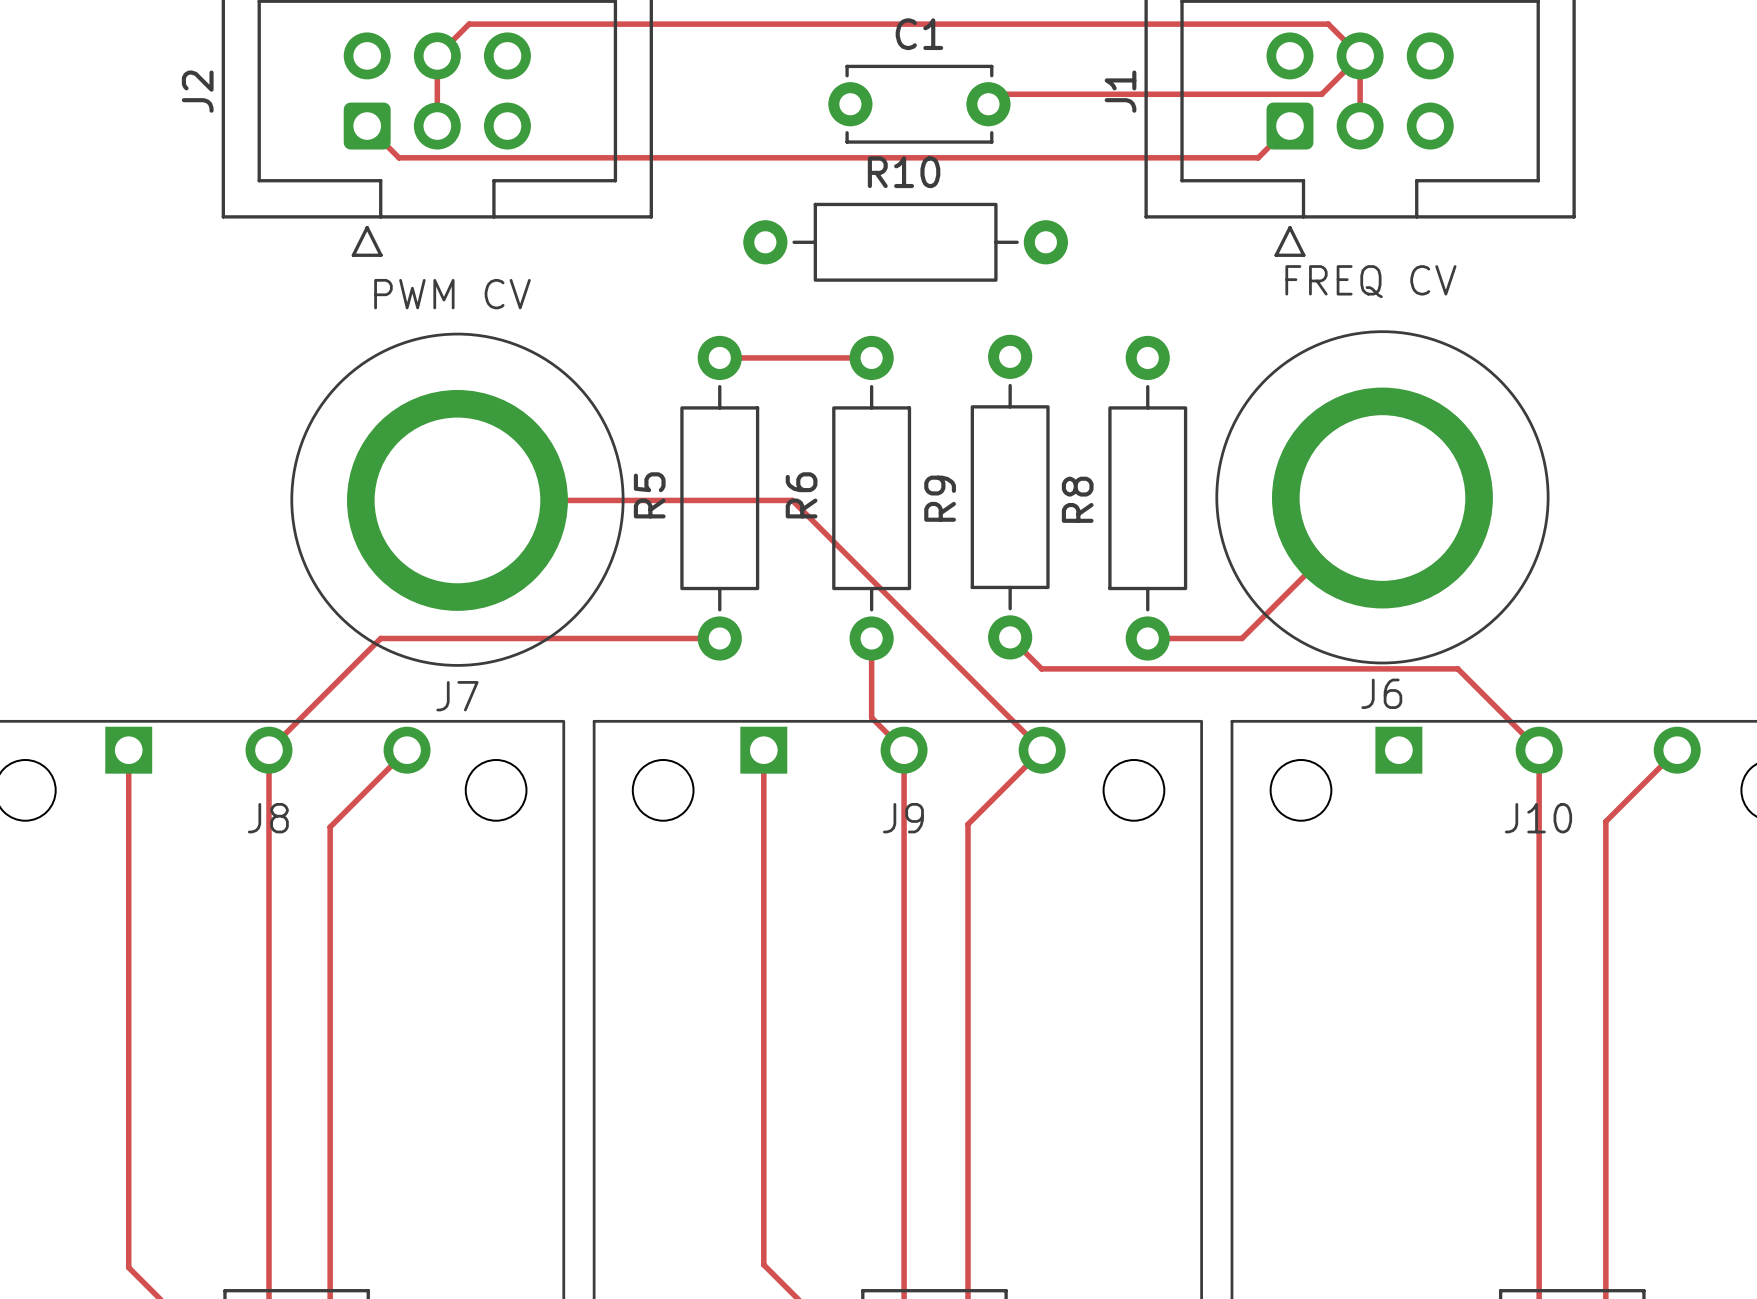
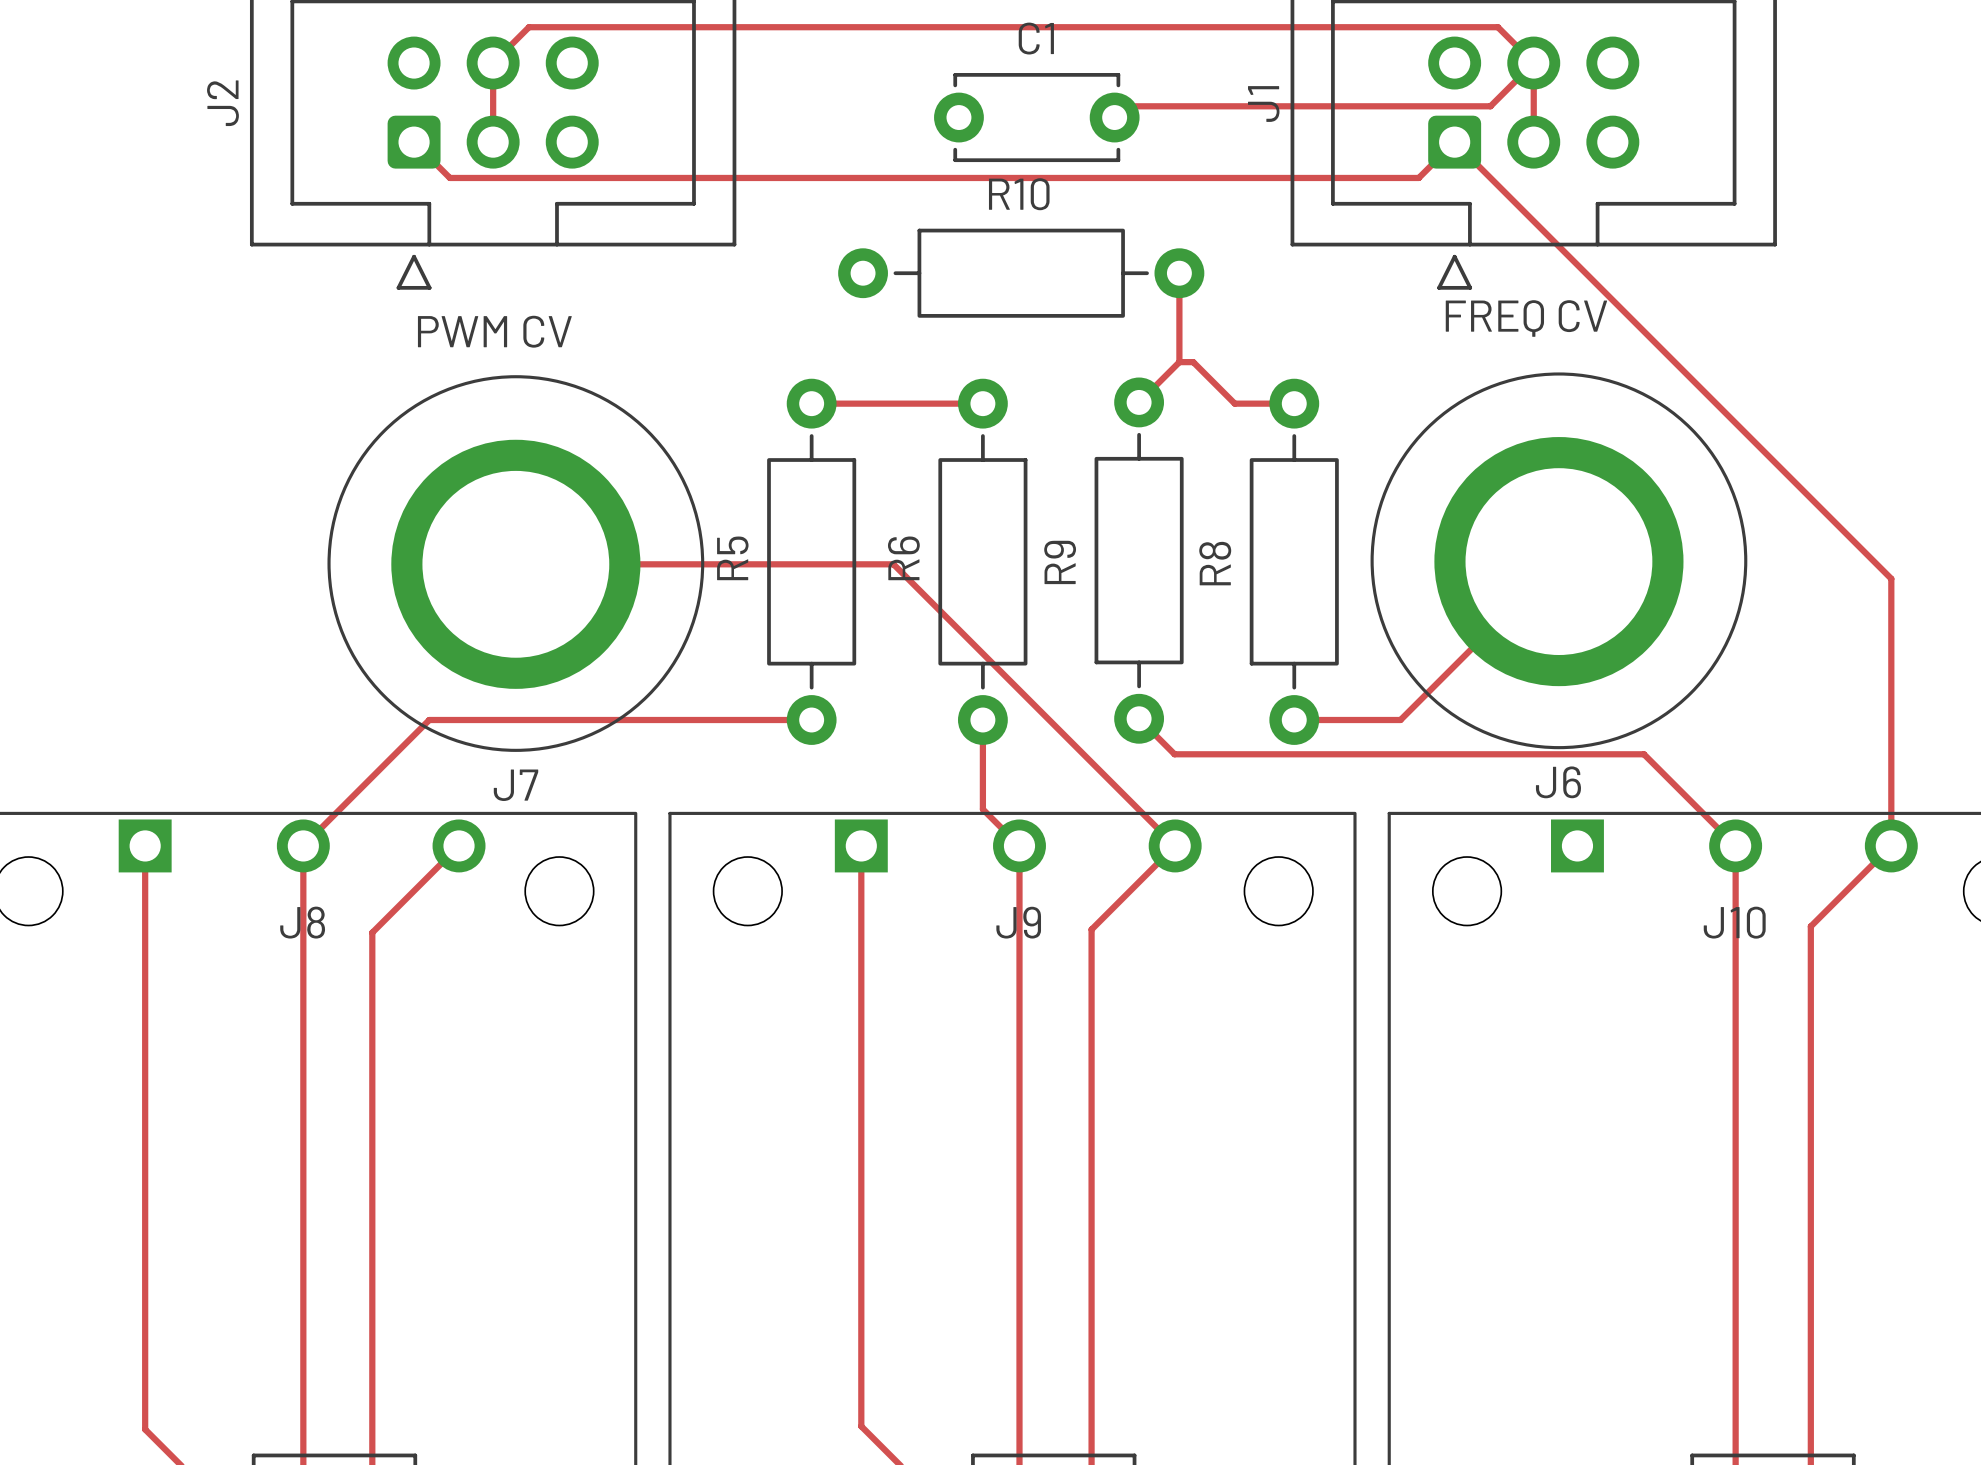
track: none -> (1454, 142) (1891, 578) (1891, 845)
track: none -> (1179, 273) (1179, 362)
track: none -> (1179, 362) (1139, 402)
track: none -> (1179, 362) (1193, 362) (1234, 403) (1294, 403)

